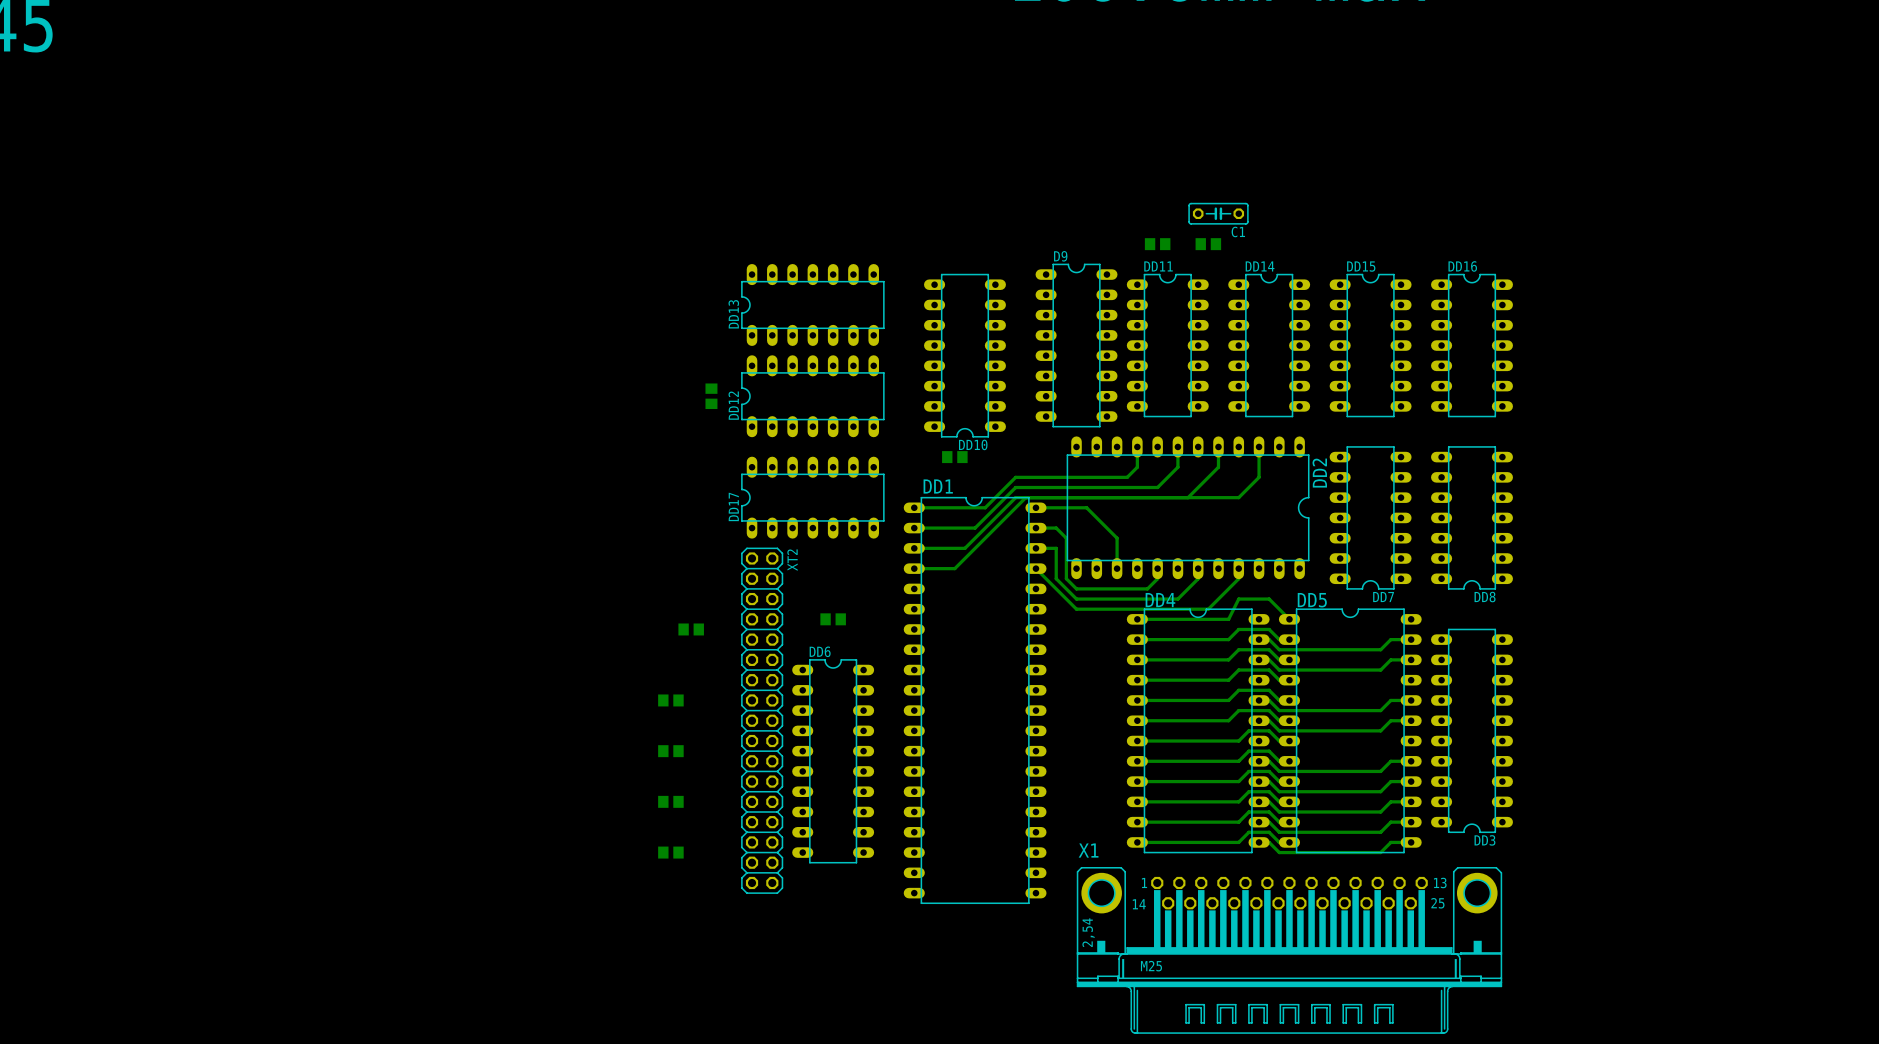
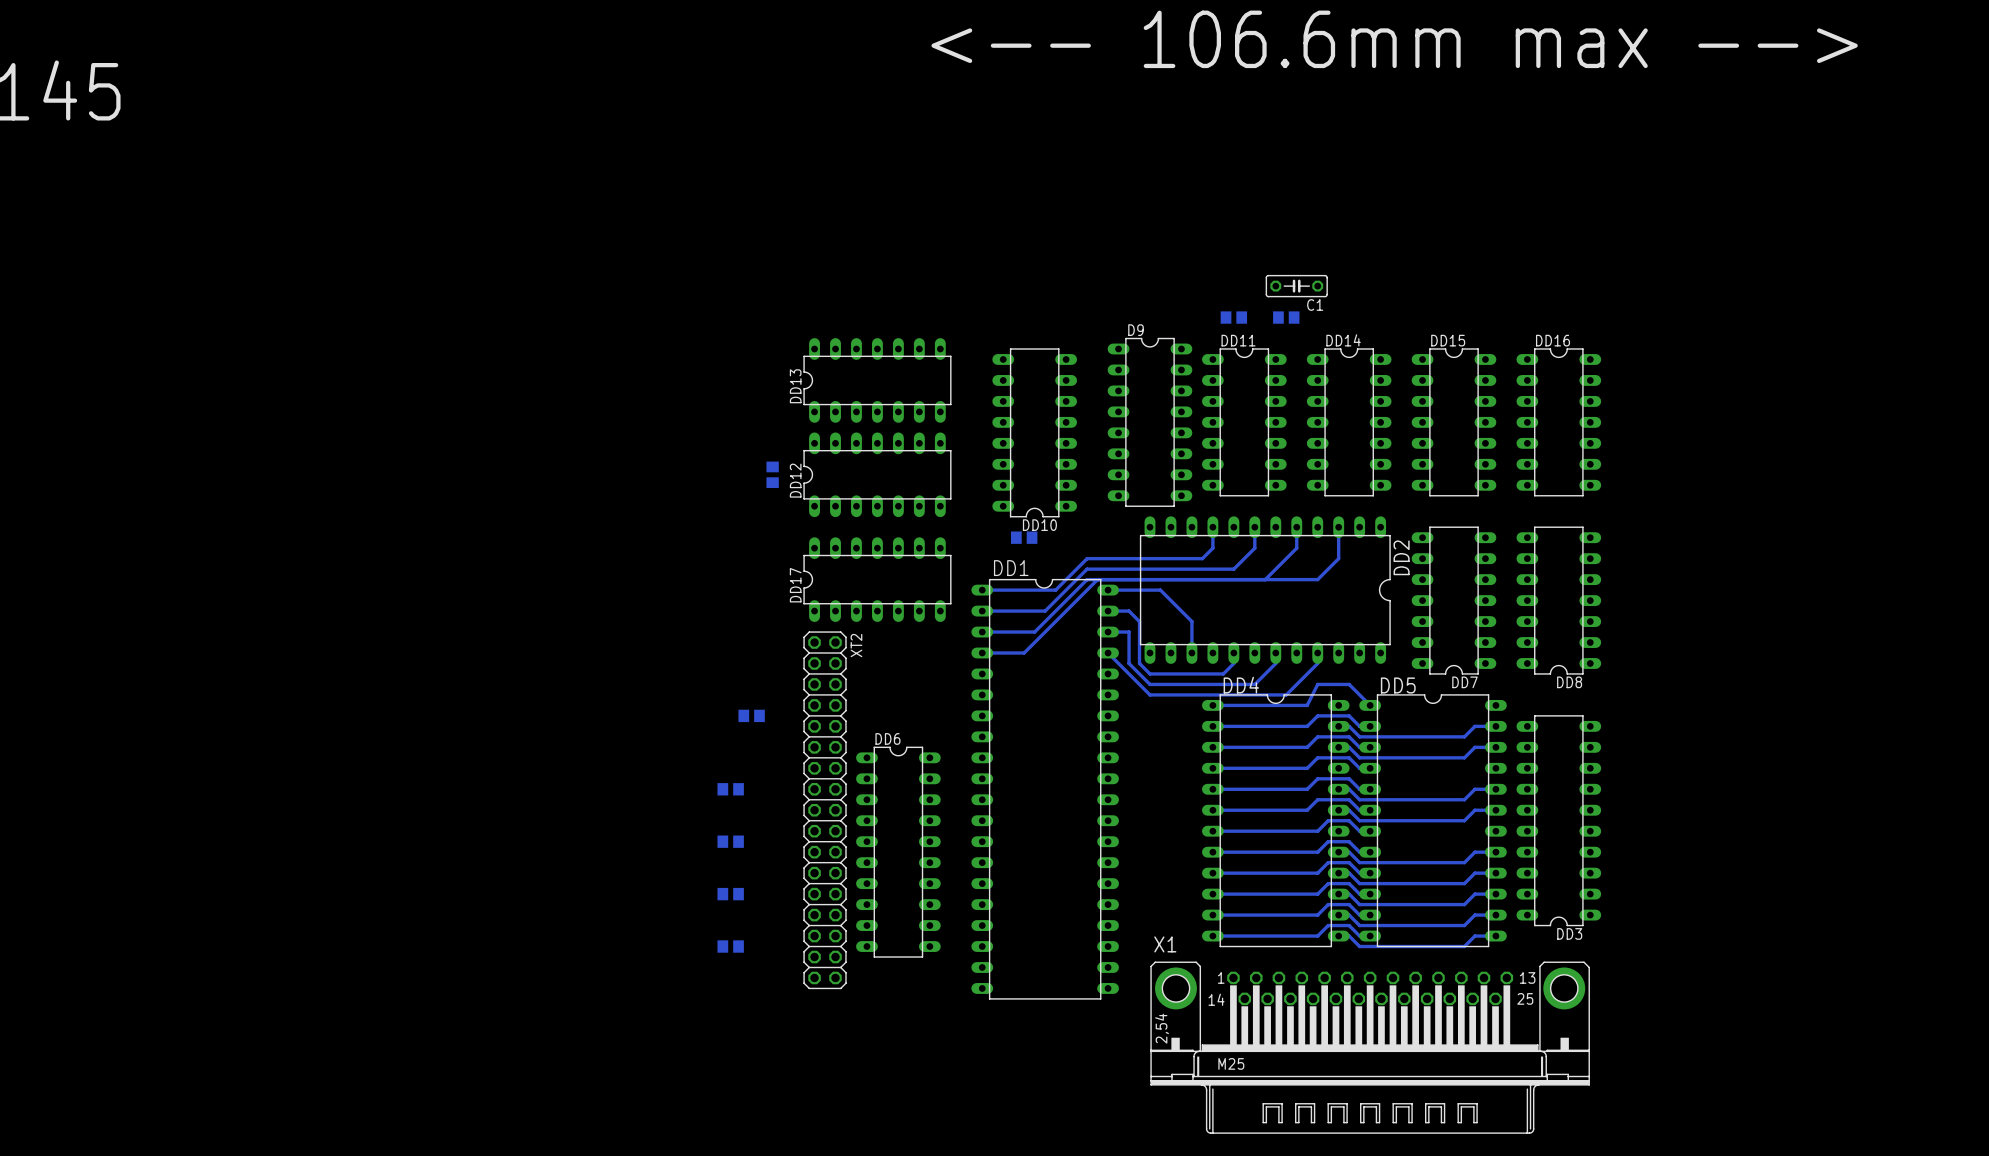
part: (833, 619) -> none

